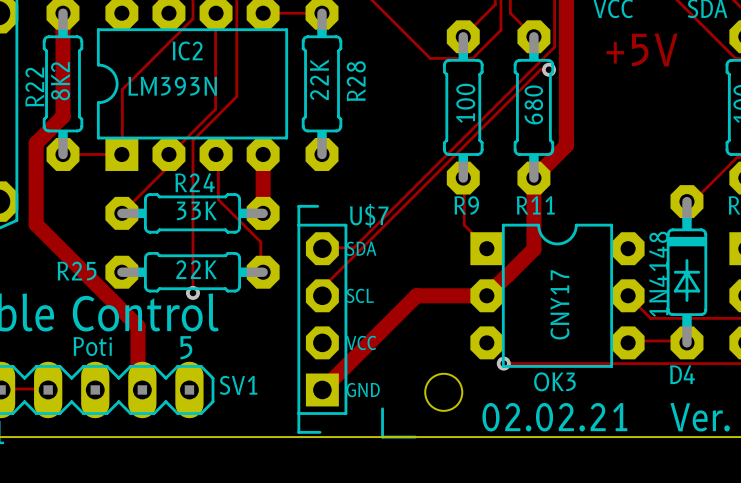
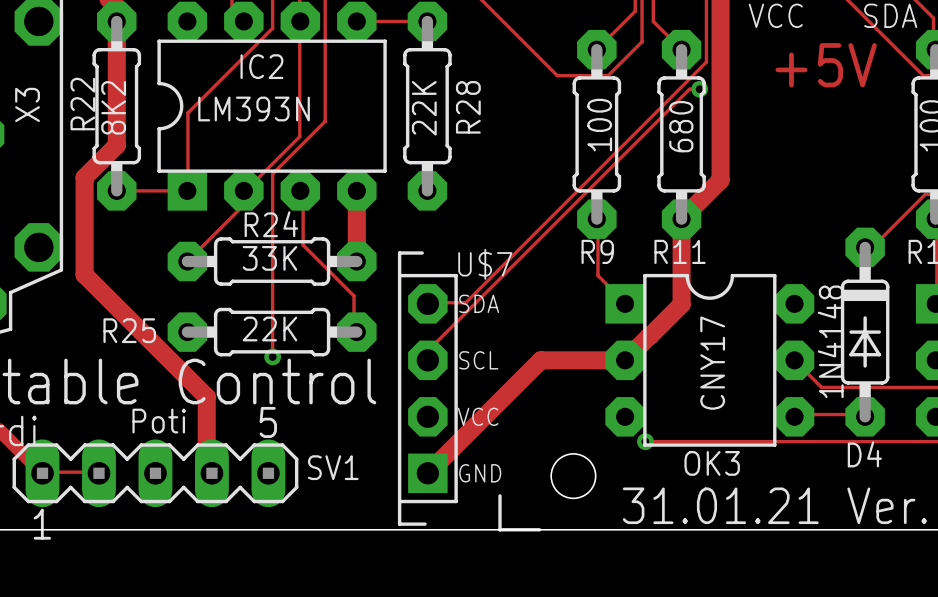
text: 02.02.21 (554, 417) -> 31.01.21 (720, 505)

